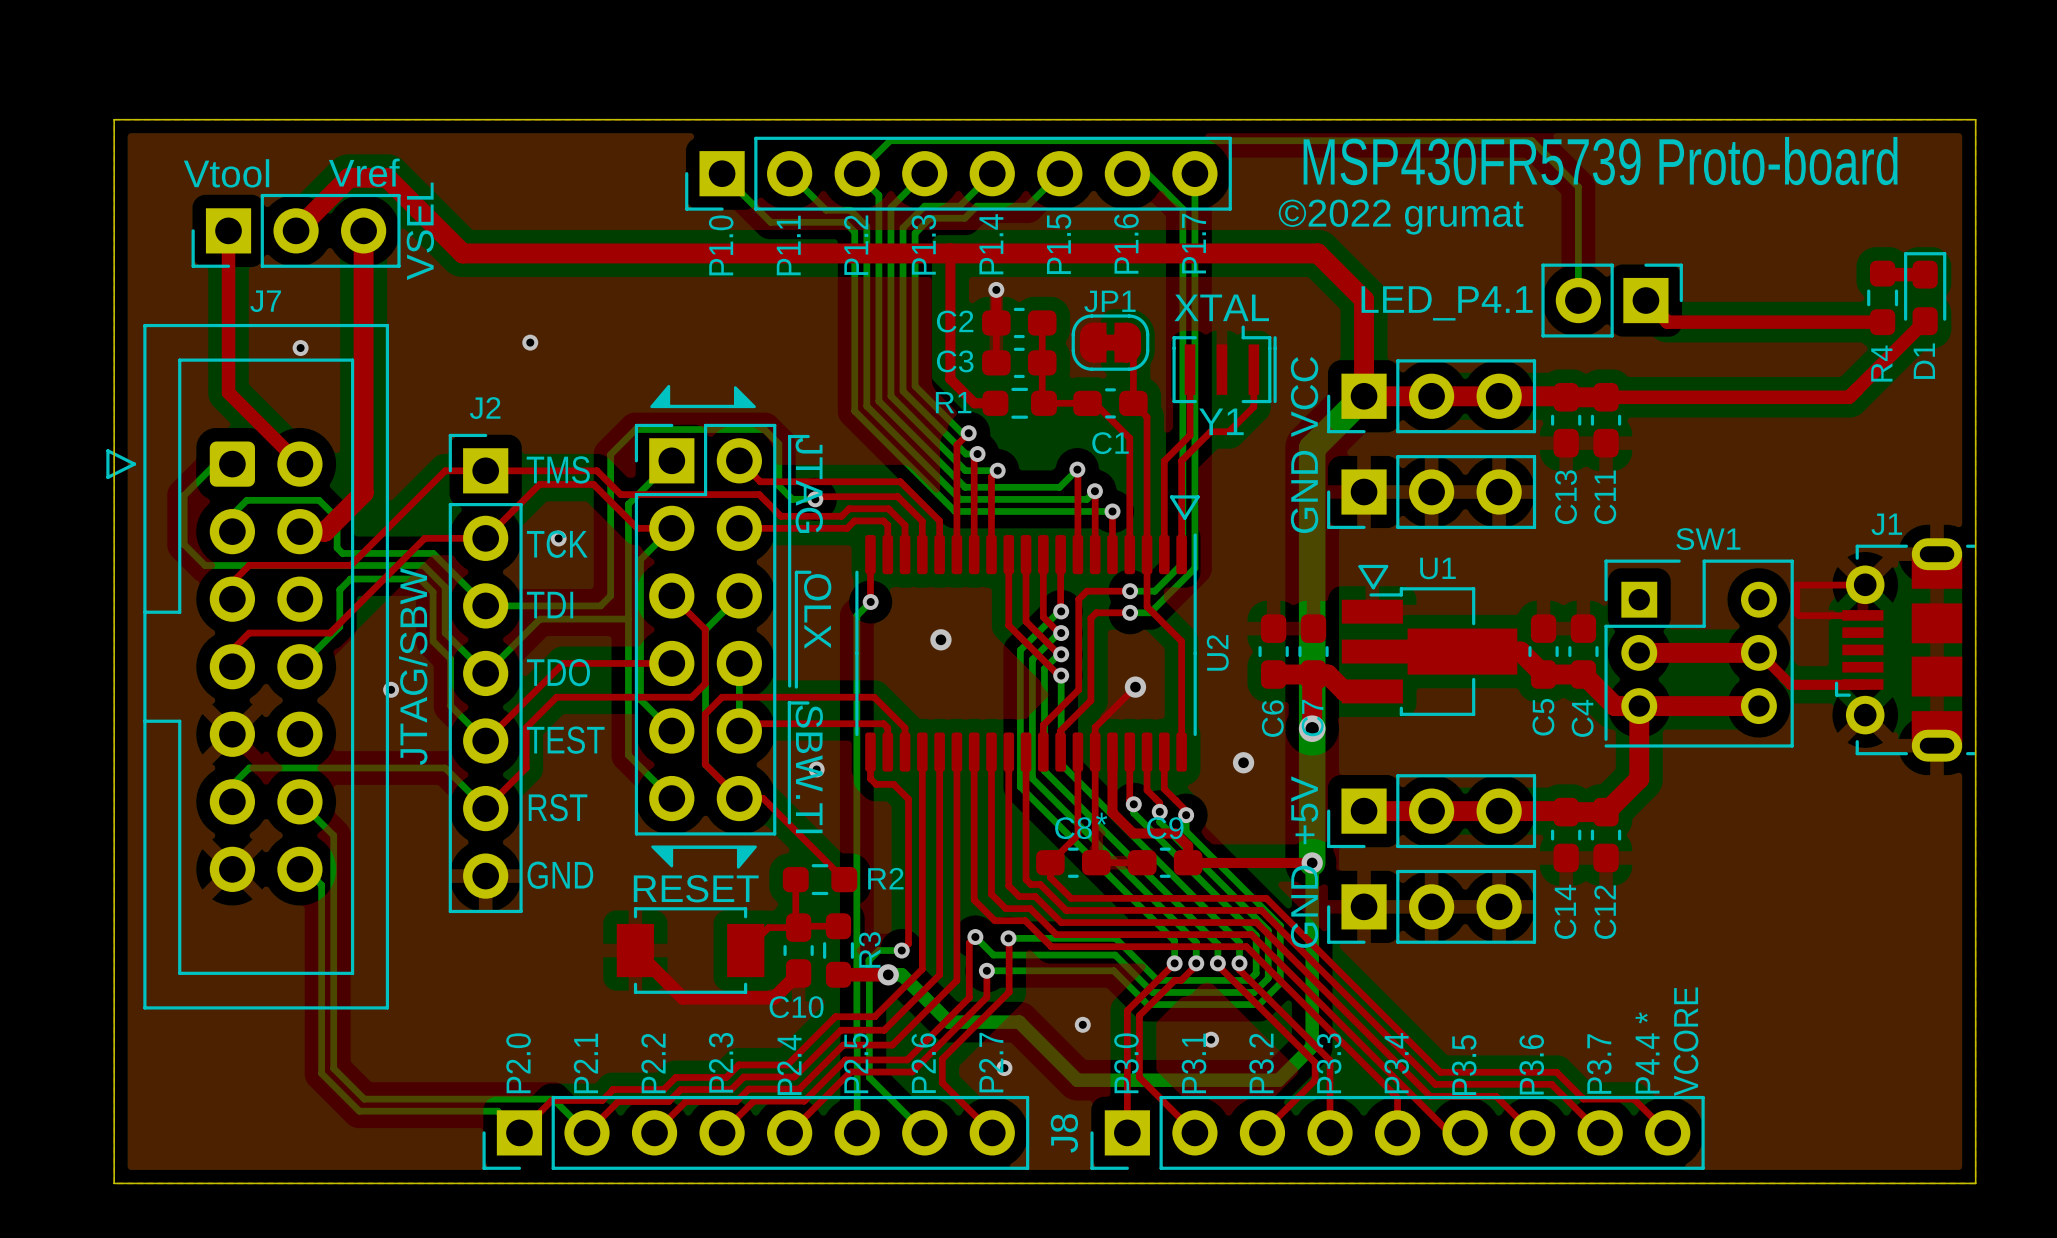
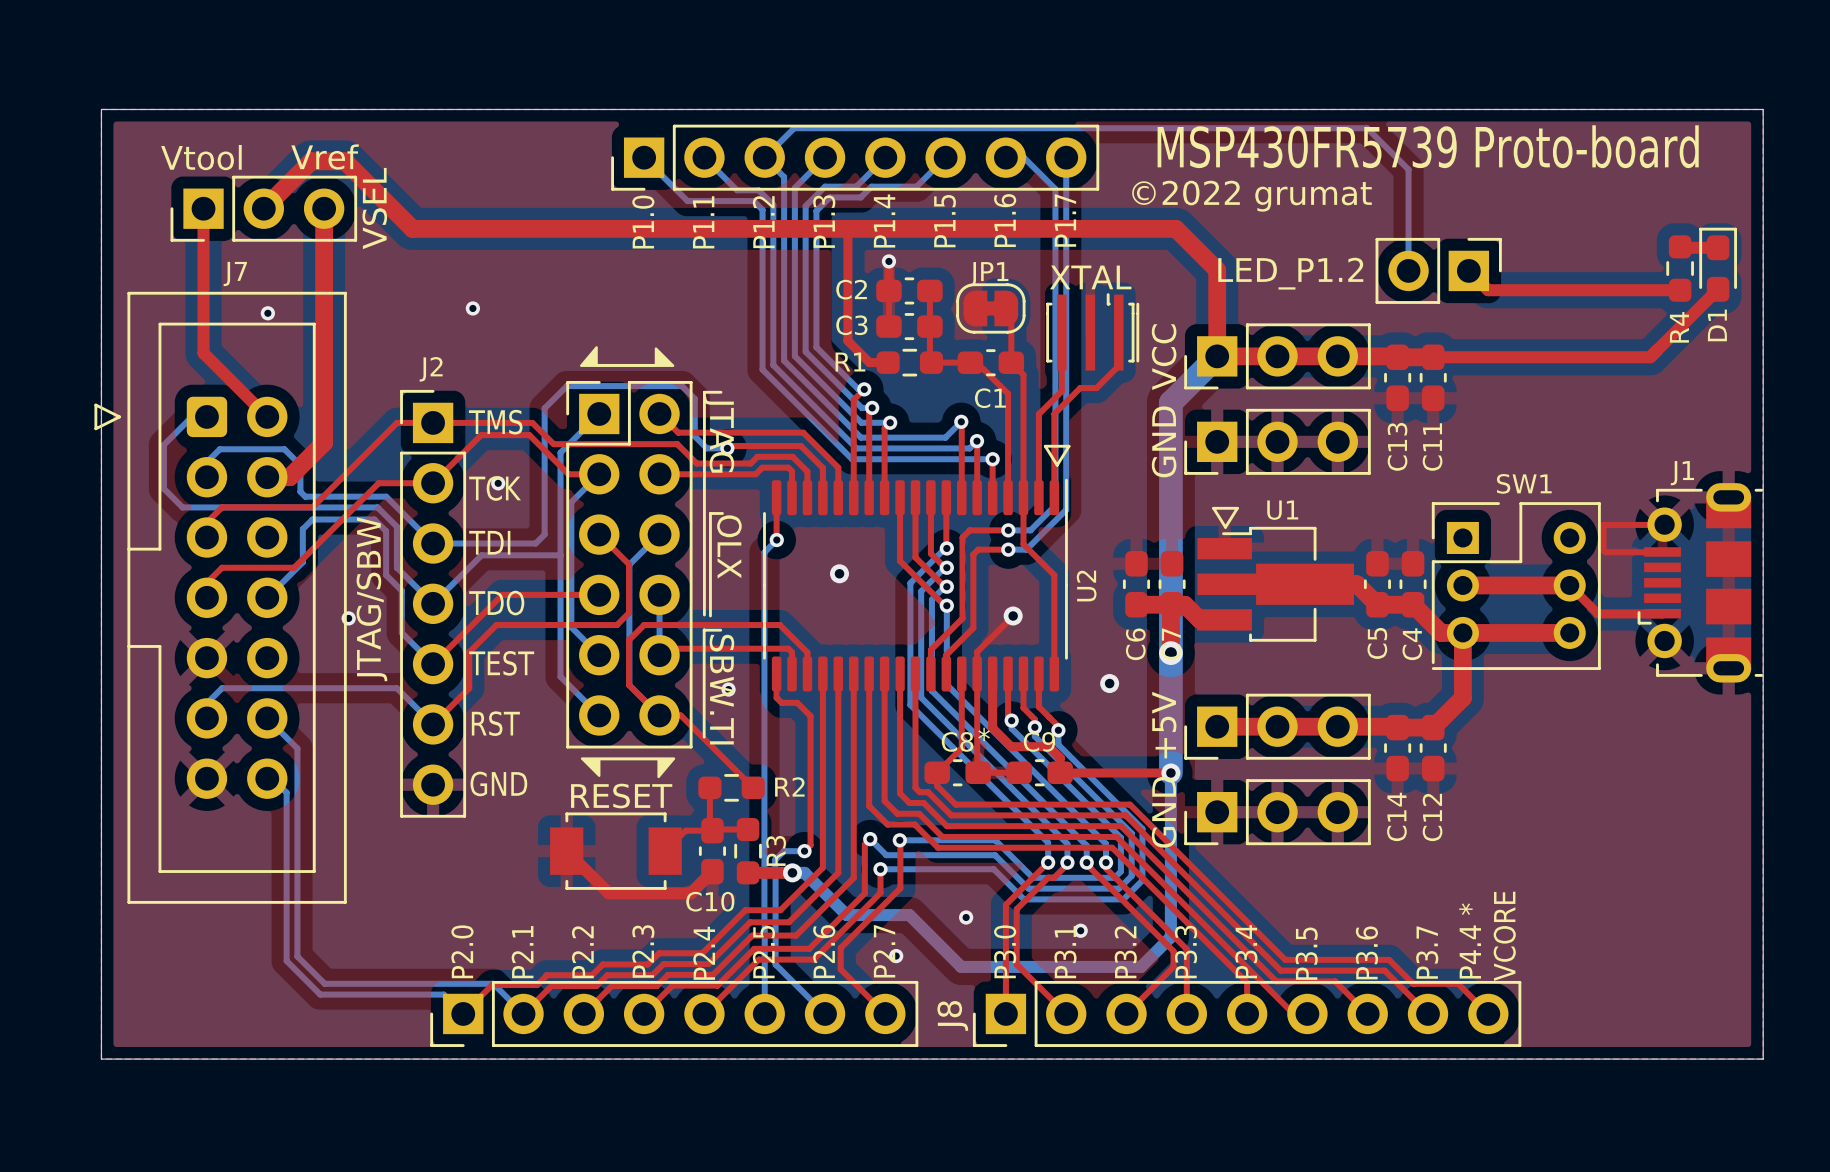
part value: LED_P4.1 (1447, 303) -> LED_P1.2 (1290, 273)
Y1: (1224, 364) -> none
part: none -> (1092, 331)

